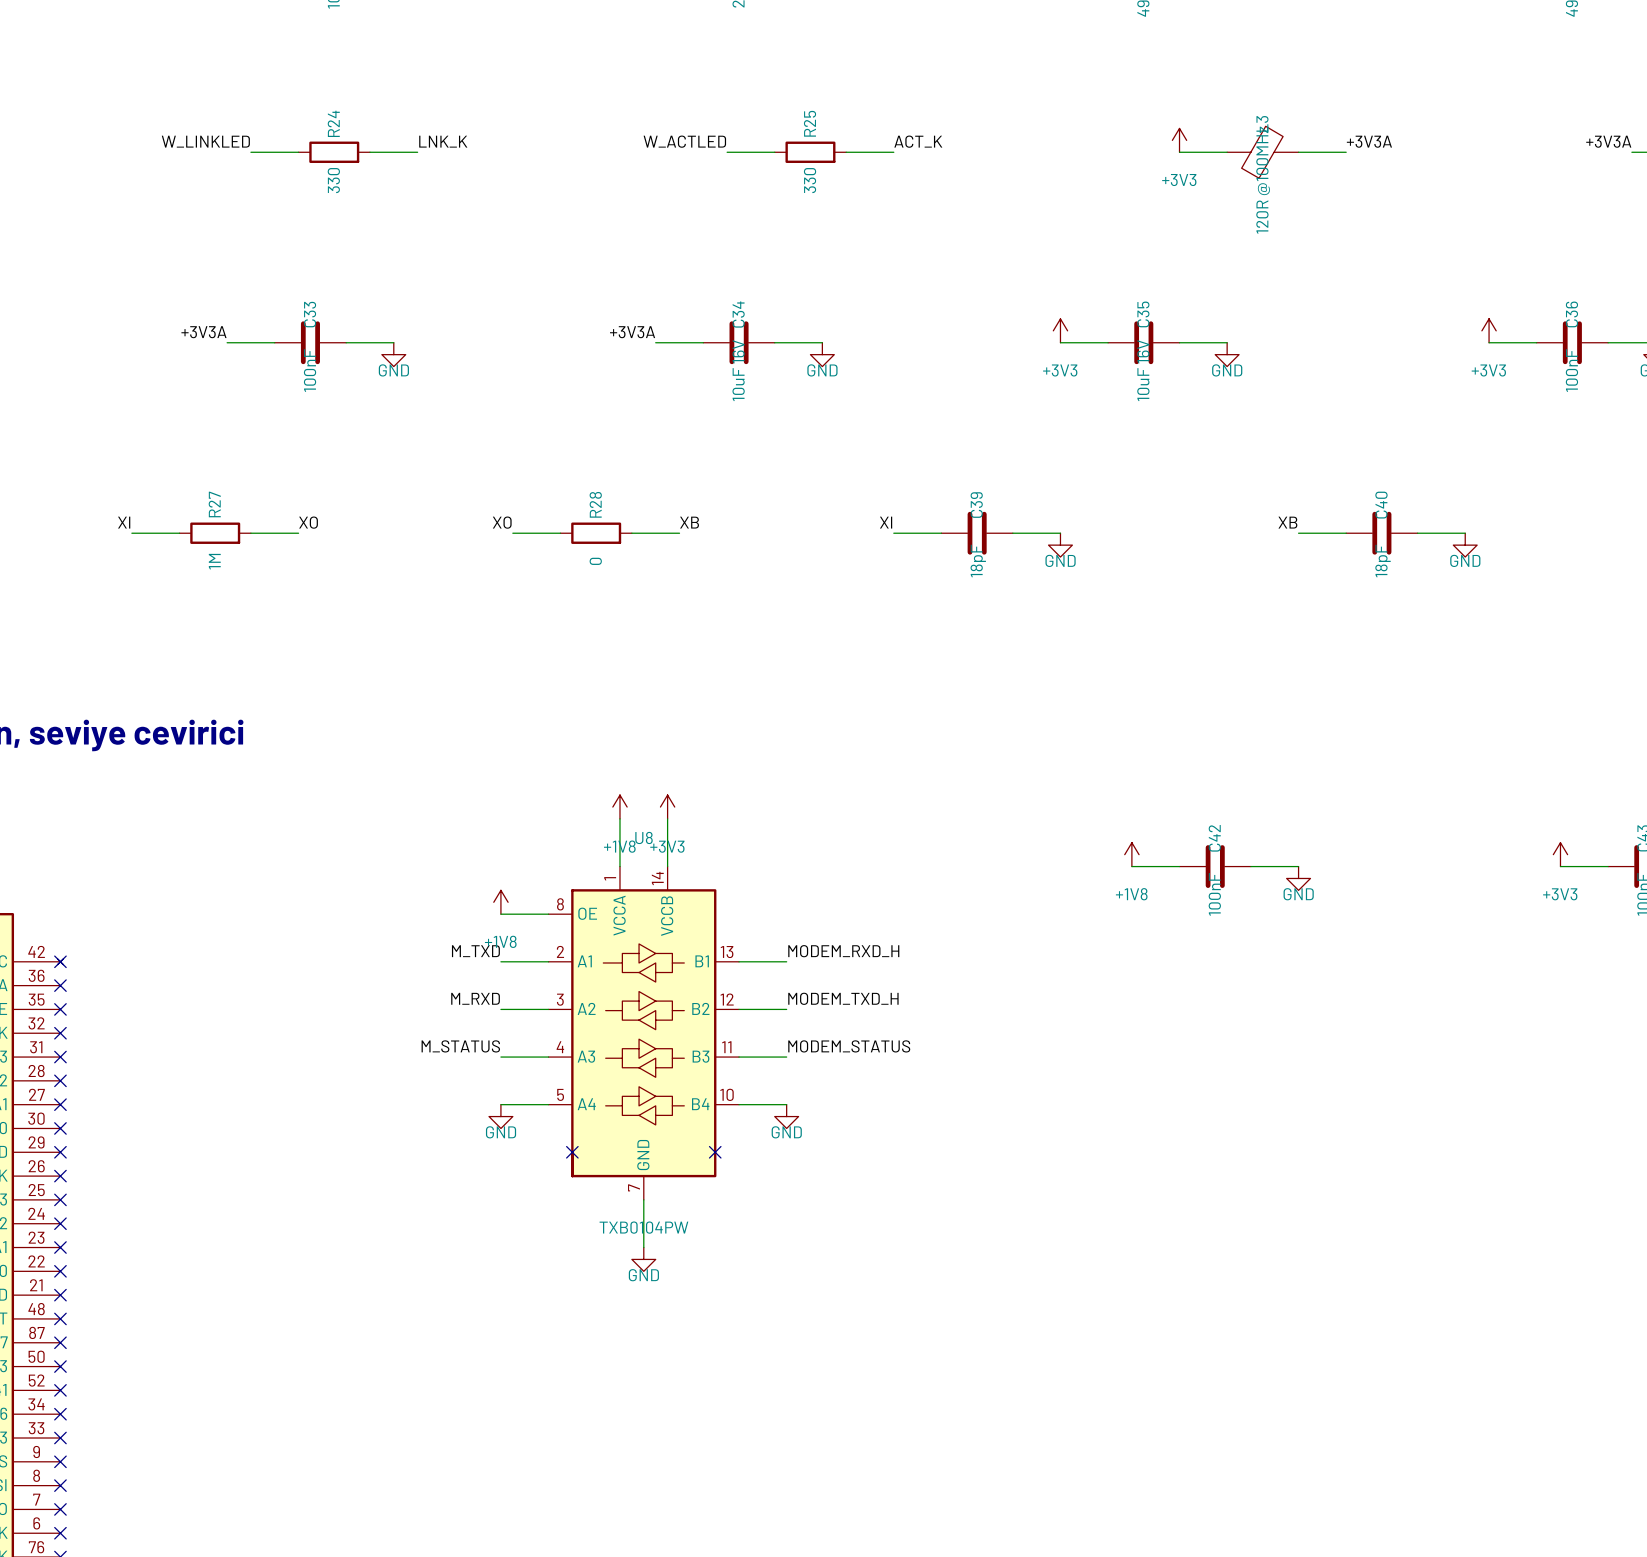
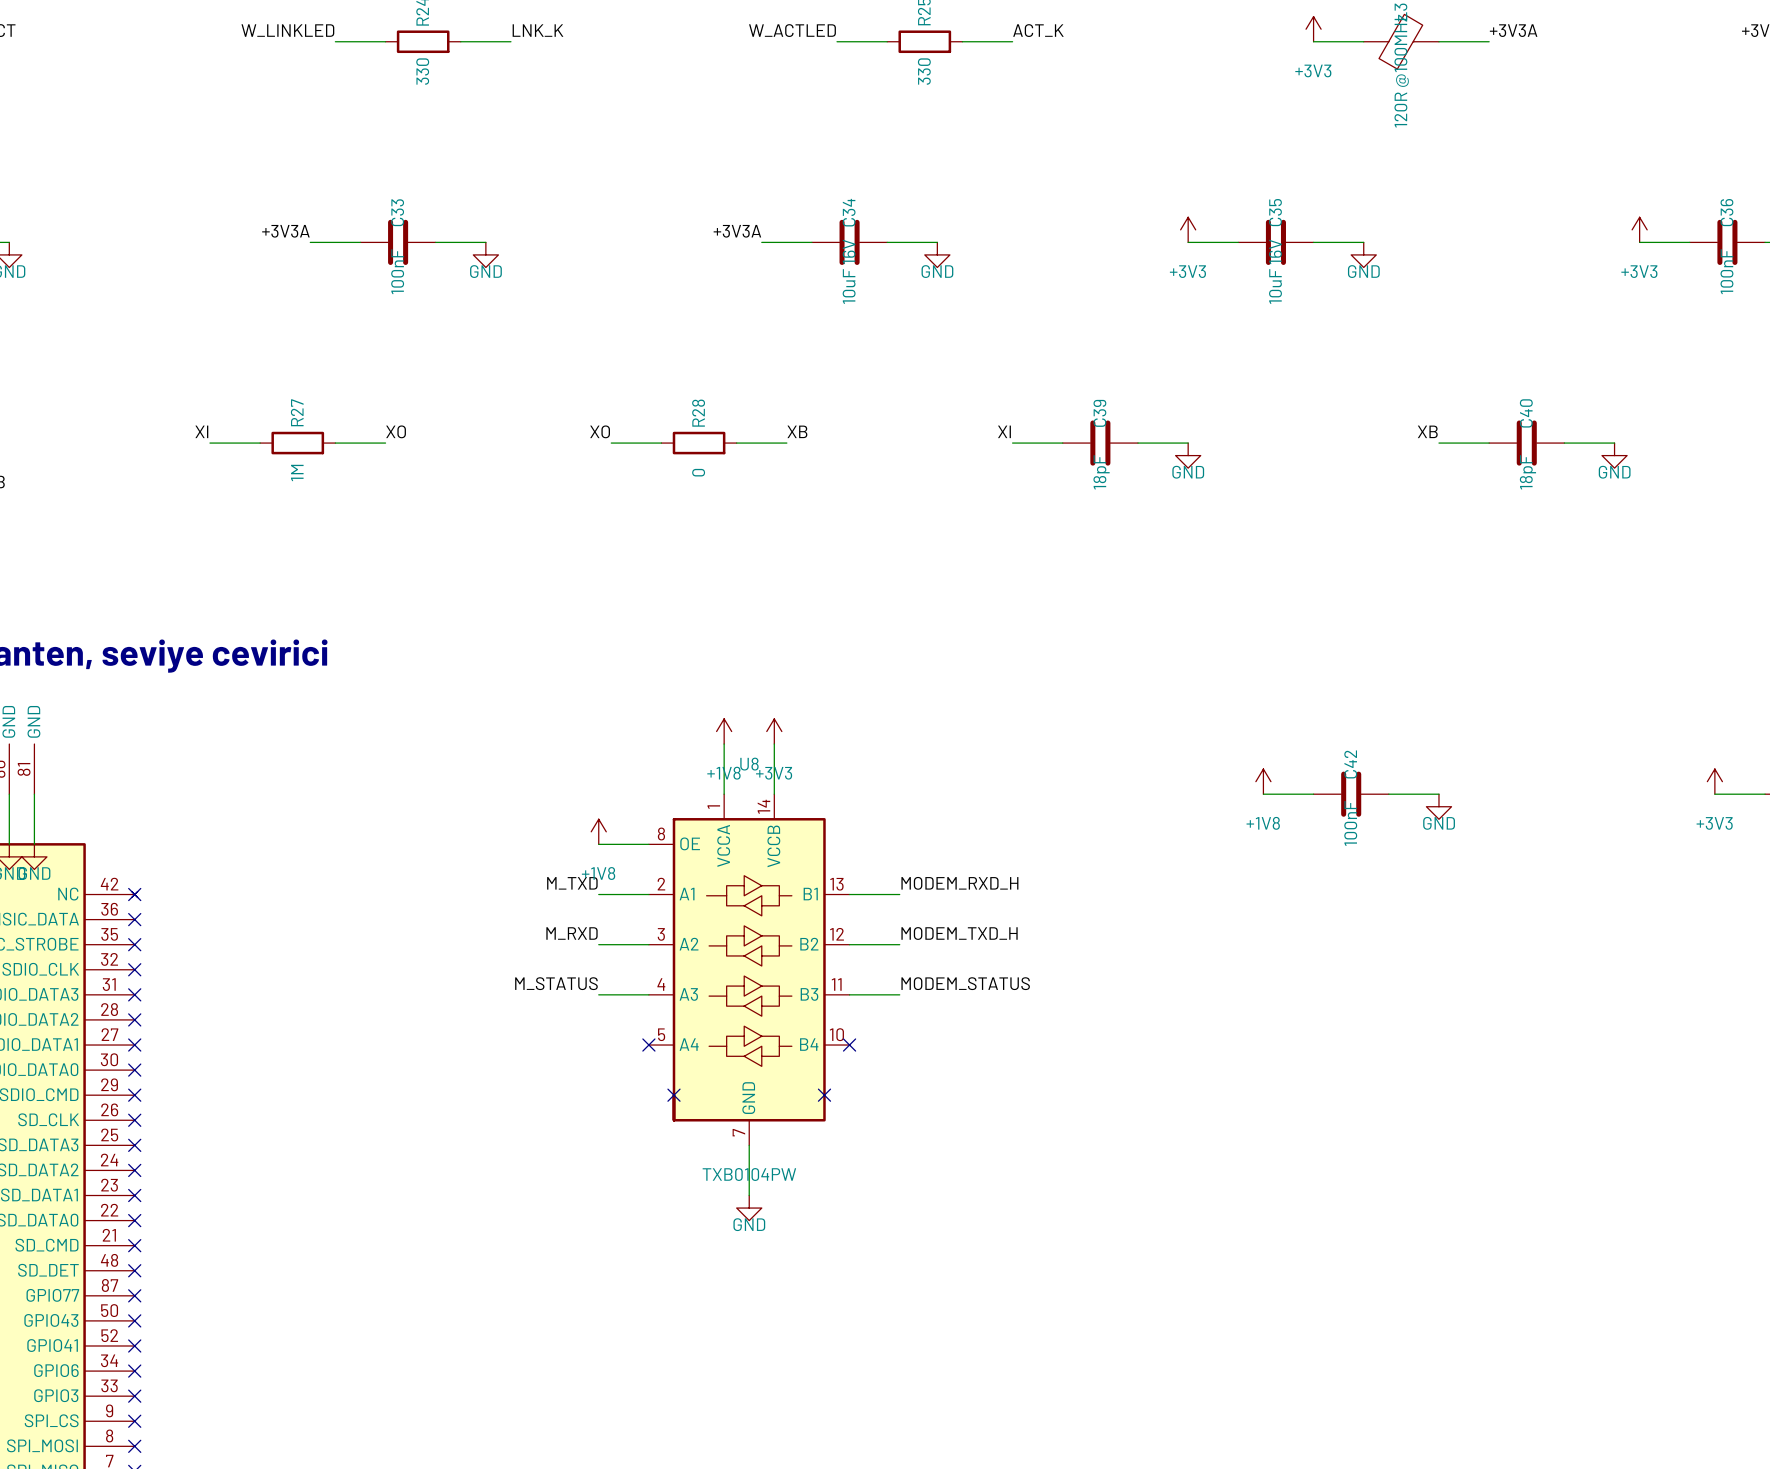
wire: (500, 1104) (548, 1104) -> none
no-connect mark: none -> (648, 1045)
wire: (739, 1104) (786, 1104) -> none
no-connect mark: none -> (849, 1045)
power symbol: GND (500, 1116) -> none
power symbol: GND (786, 1116) -> none

